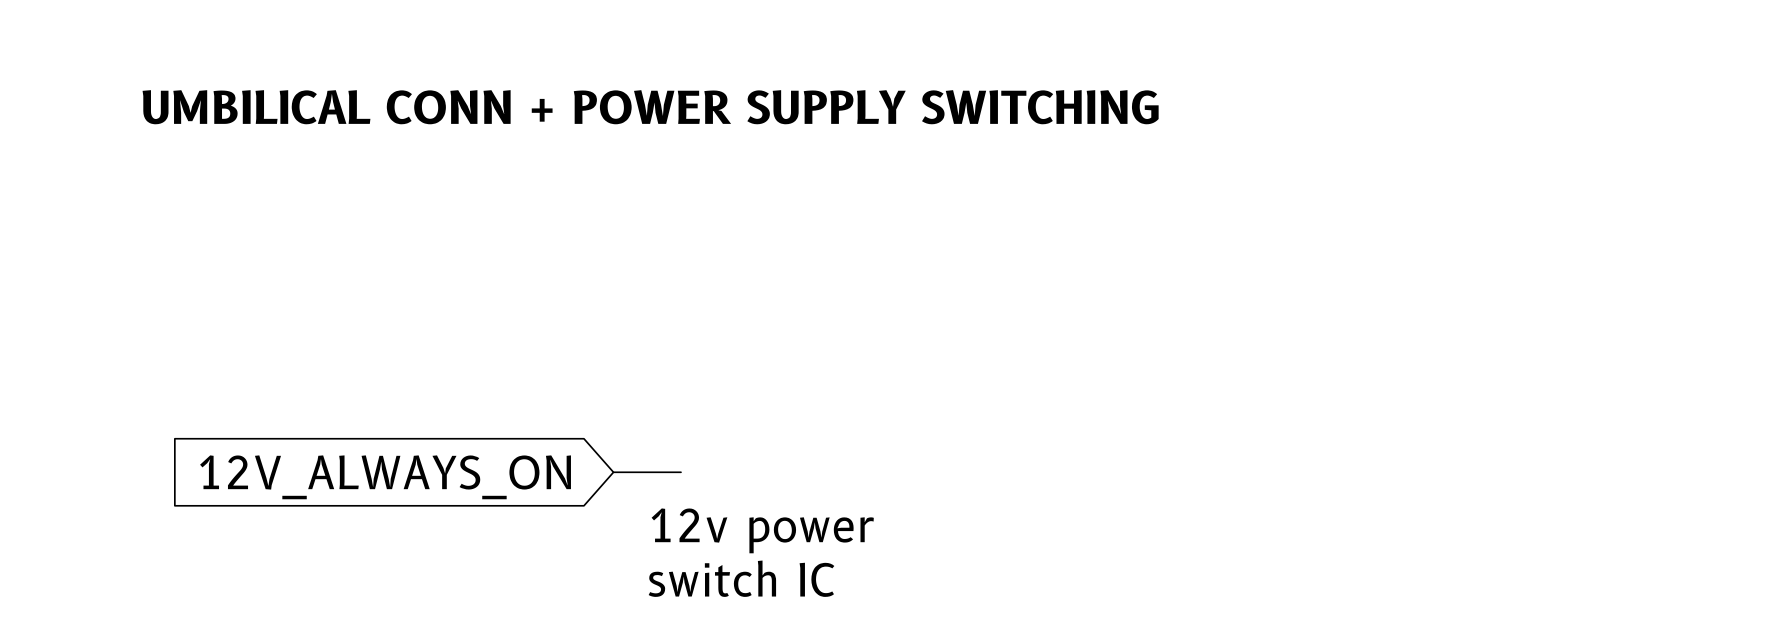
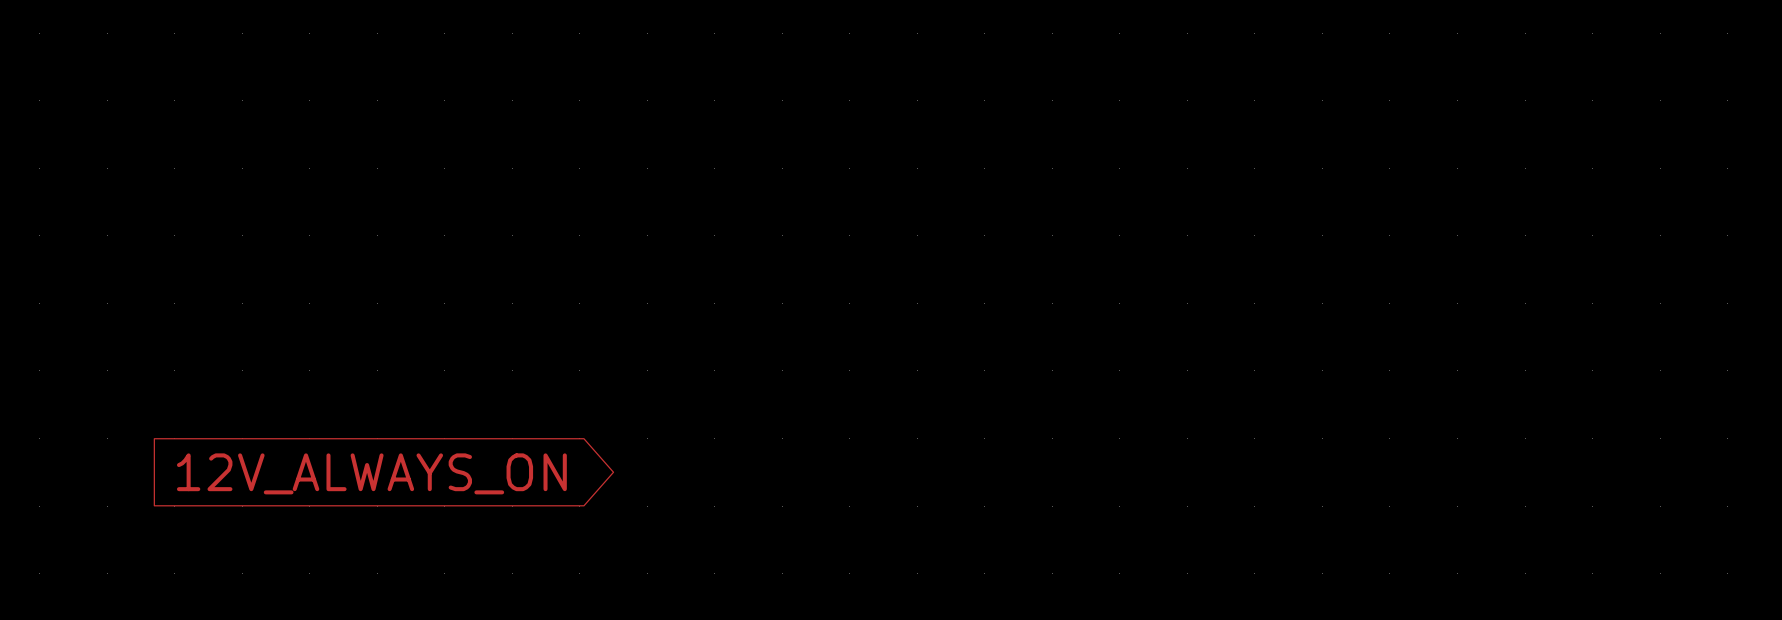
text: UMBILICAL CONN + POWER SUPPLY SWITCHING (650, 107) -> none
wire: (613, 472) (681, 472) -> none
text: 12v power (762, 530) -> none
text: switch IC (741, 578) -> none

